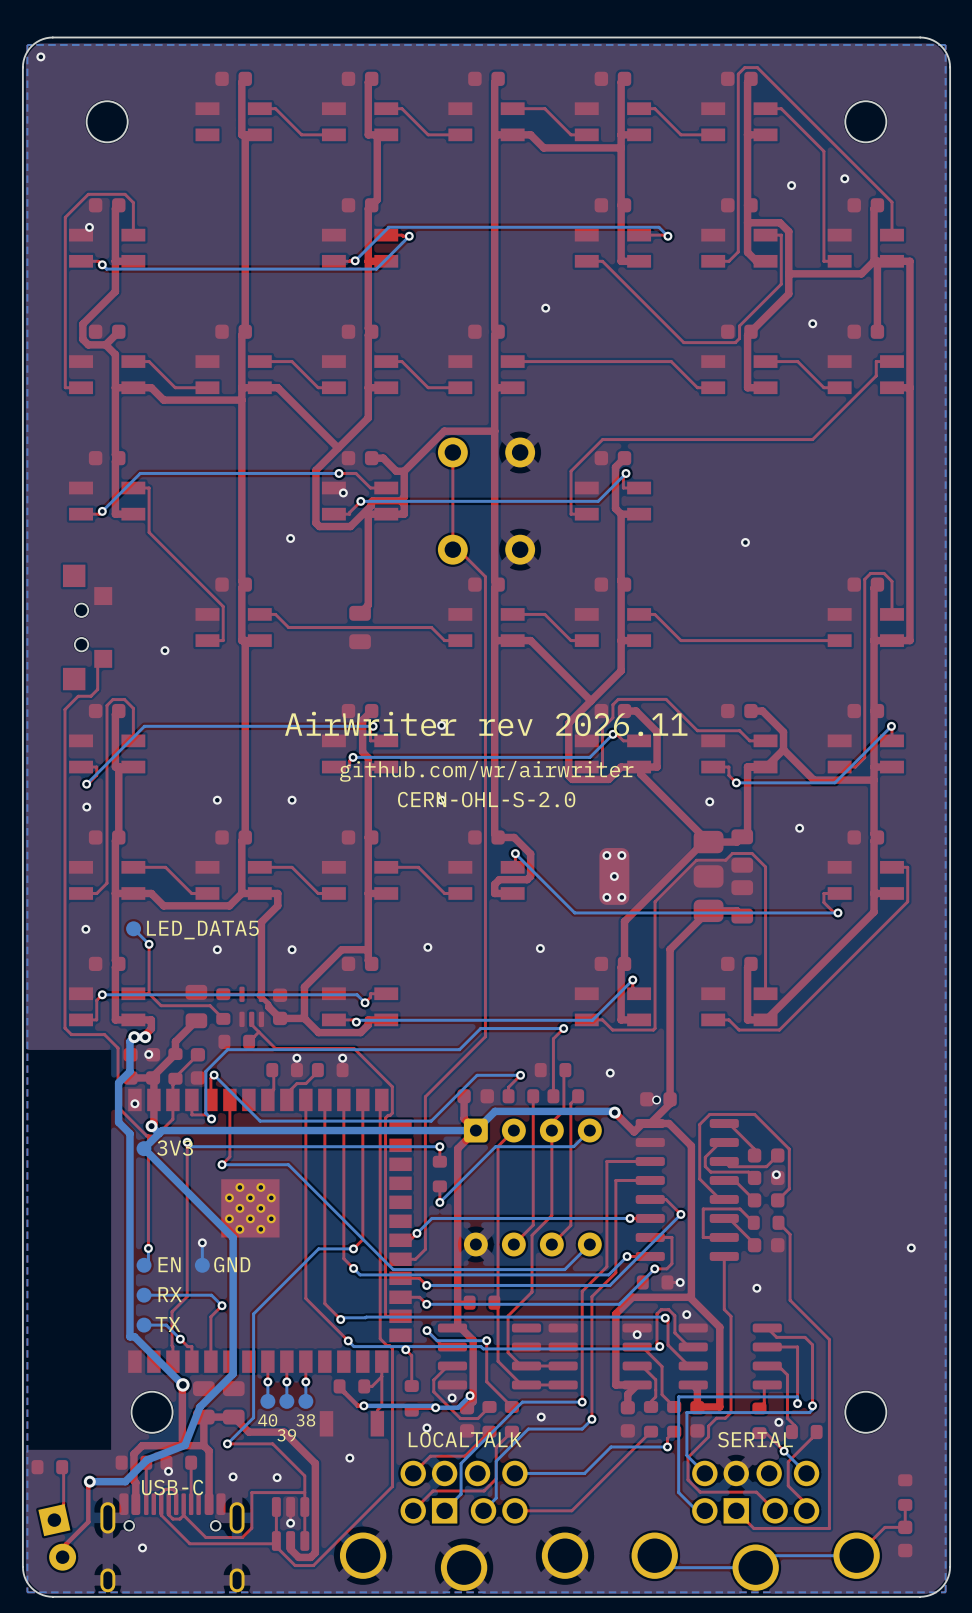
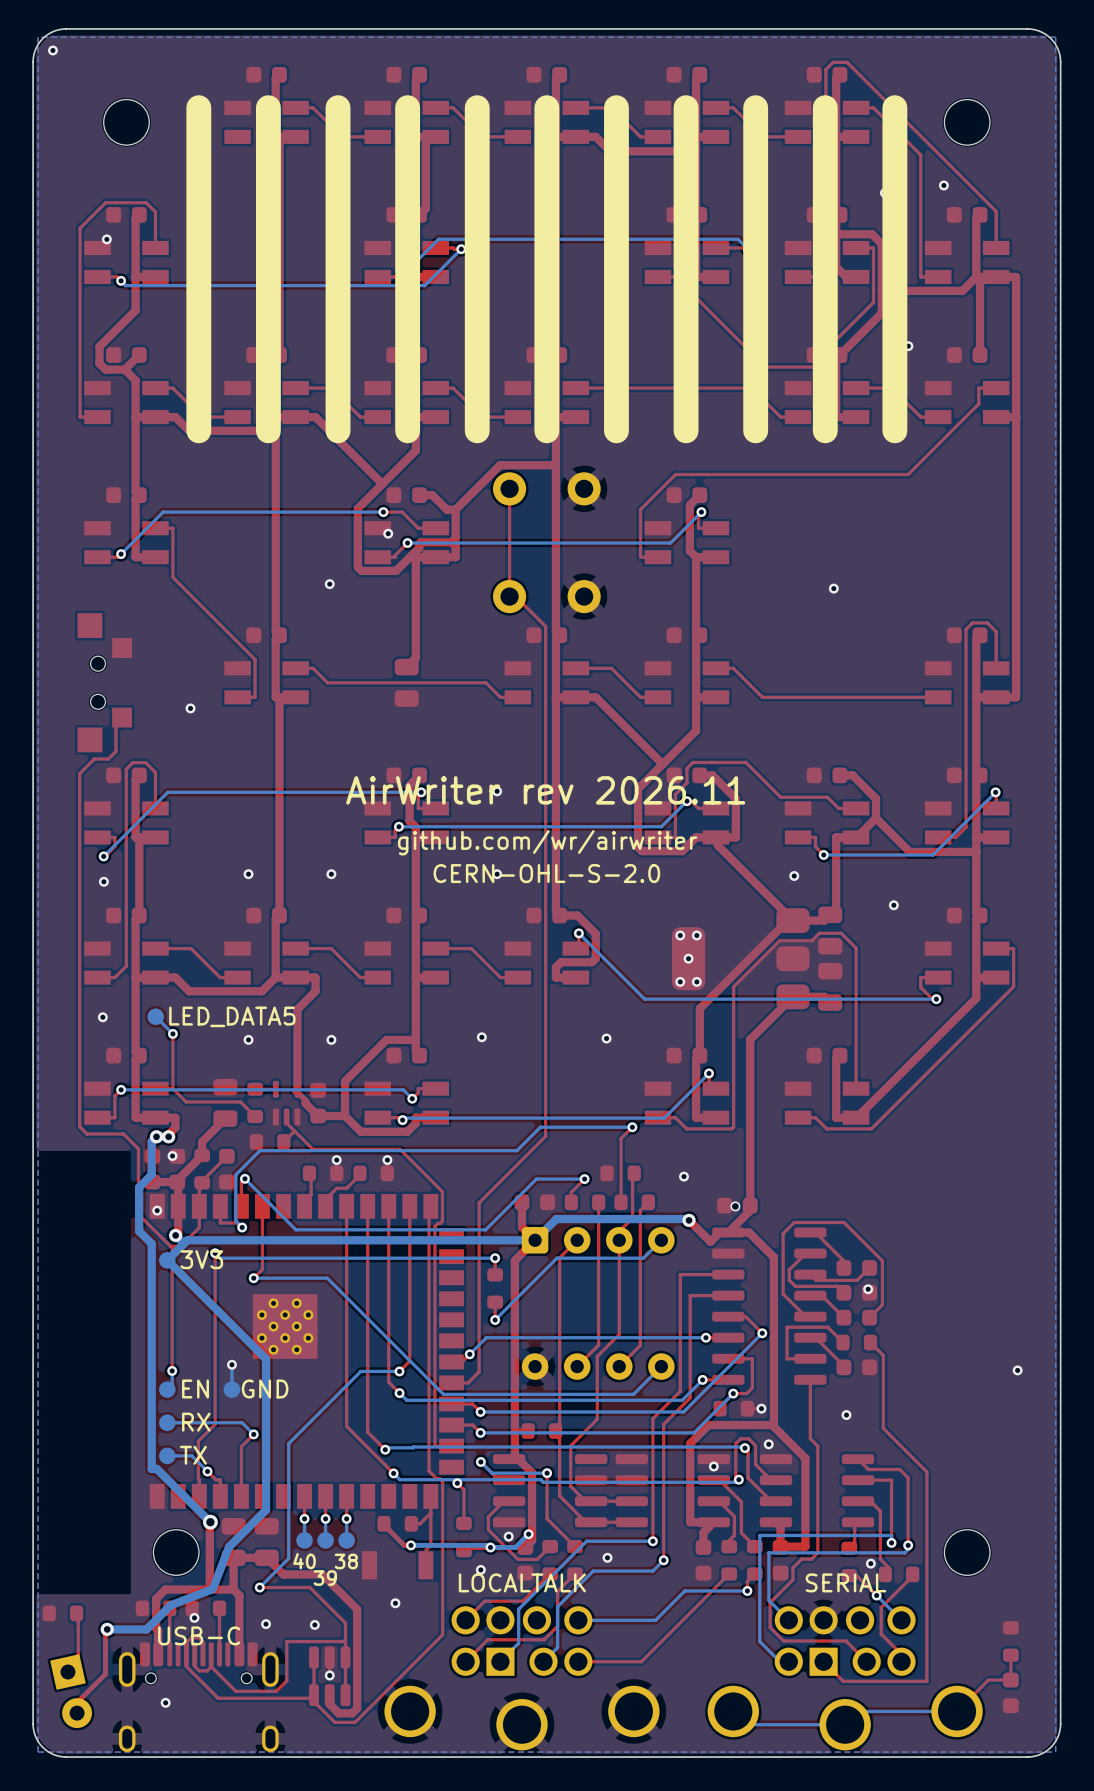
line: none -> (198, 107) (198, 430)
line: none -> (268, 107) (268, 430)
line: none -> (338, 107) (338, 430)
line: none -> (407, 107) (407, 430)
line: none -> (477, 107) (477, 430)
line: none -> (546, 107) (546, 430)
line: none -> (616, 107) (616, 430)
line: none -> (686, 107) (686, 430)
line: none -> (755, 107) (755, 430)
line: none -> (825, 107) (825, 430)
line: none -> (894, 107) (894, 430)

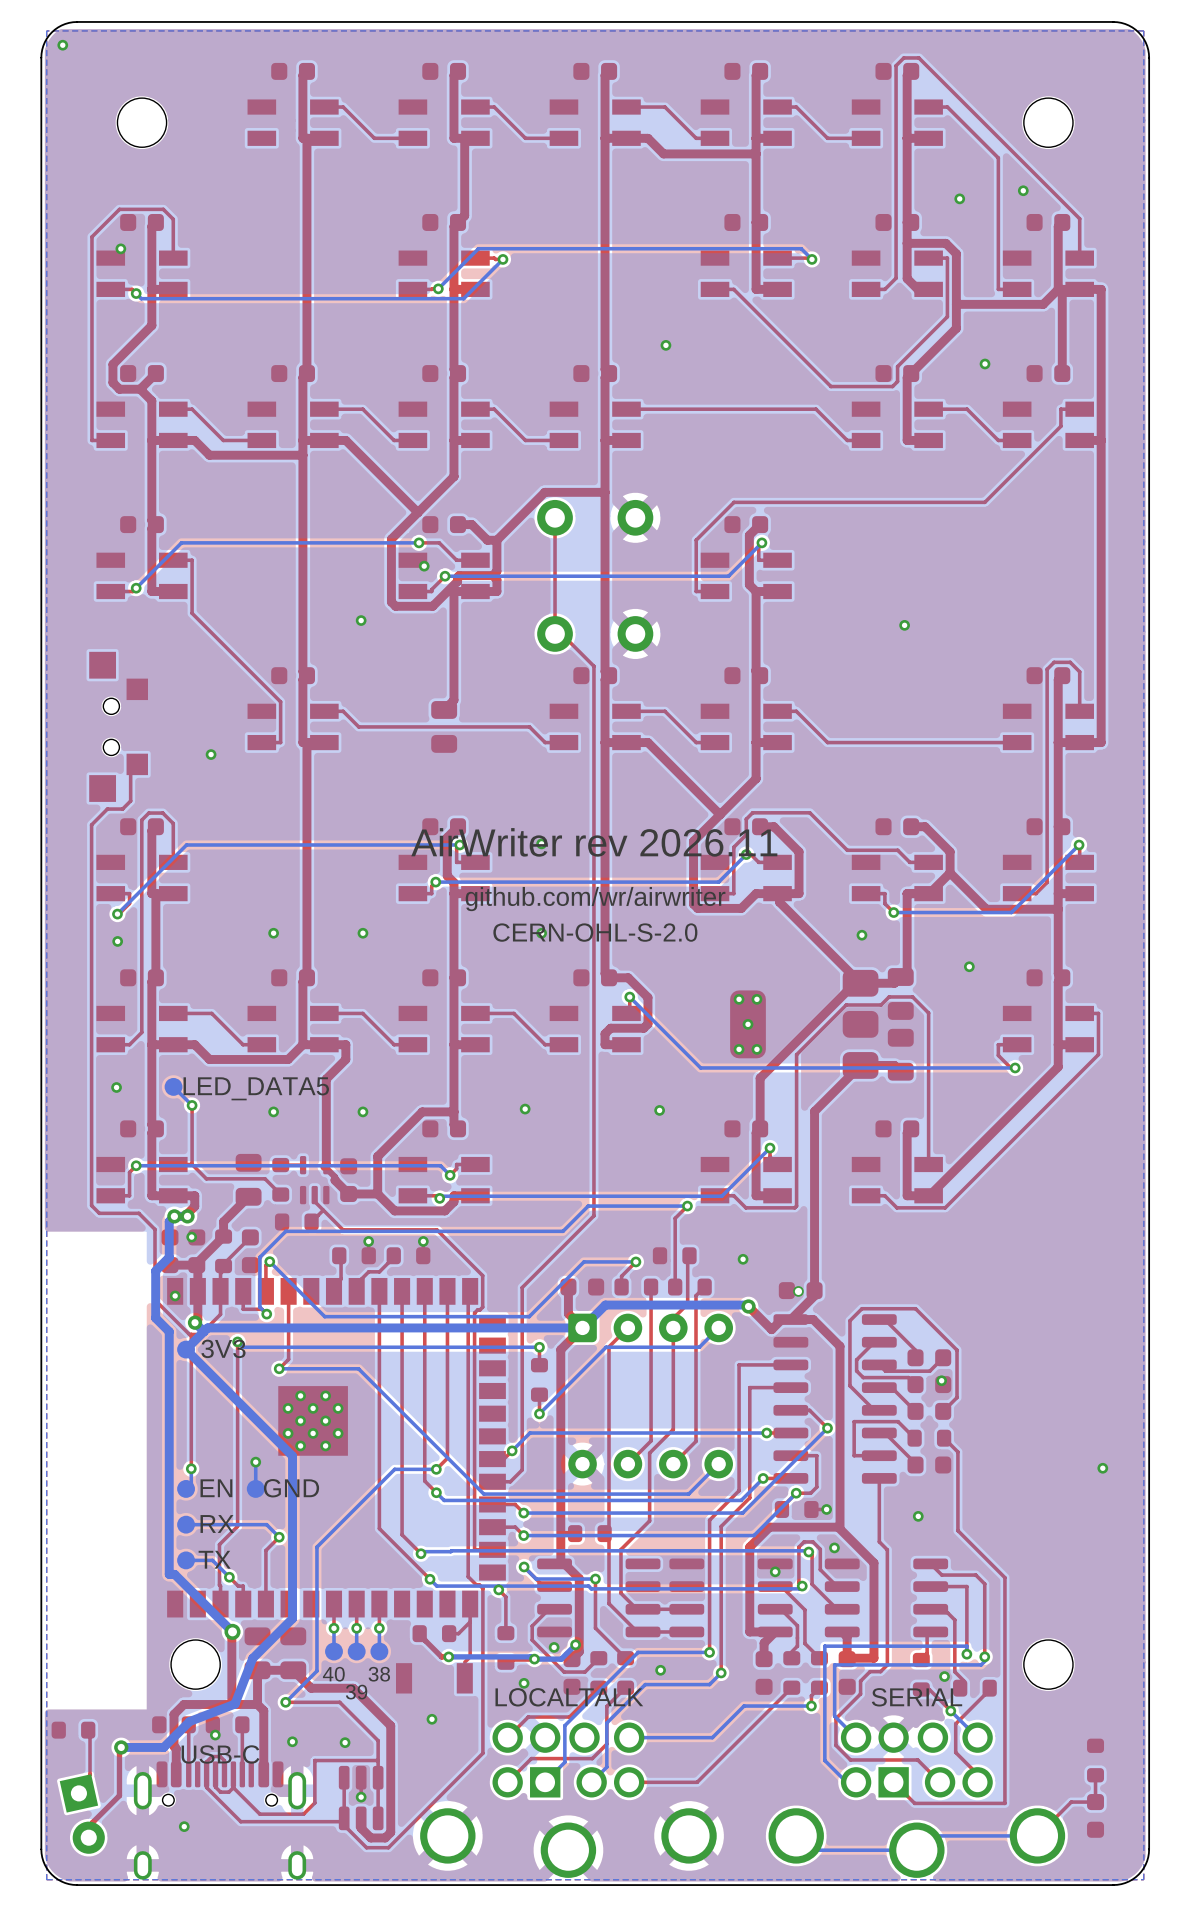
line: (198, 107) (198, 430) -> none
line: (268, 107) (268, 430) -> none
line: (338, 107) (338, 430) -> none
line: (407, 107) (407, 430) -> none
line: (477, 107) (477, 430) -> none
line: (546, 107) (546, 430) -> none
line: (616, 107) (616, 430) -> none
line: (686, 107) (686, 430) -> none
line: (755, 107) (755, 430) -> none
line: (825, 107) (825, 430) -> none
line: (894, 107) (894, 430) -> none

